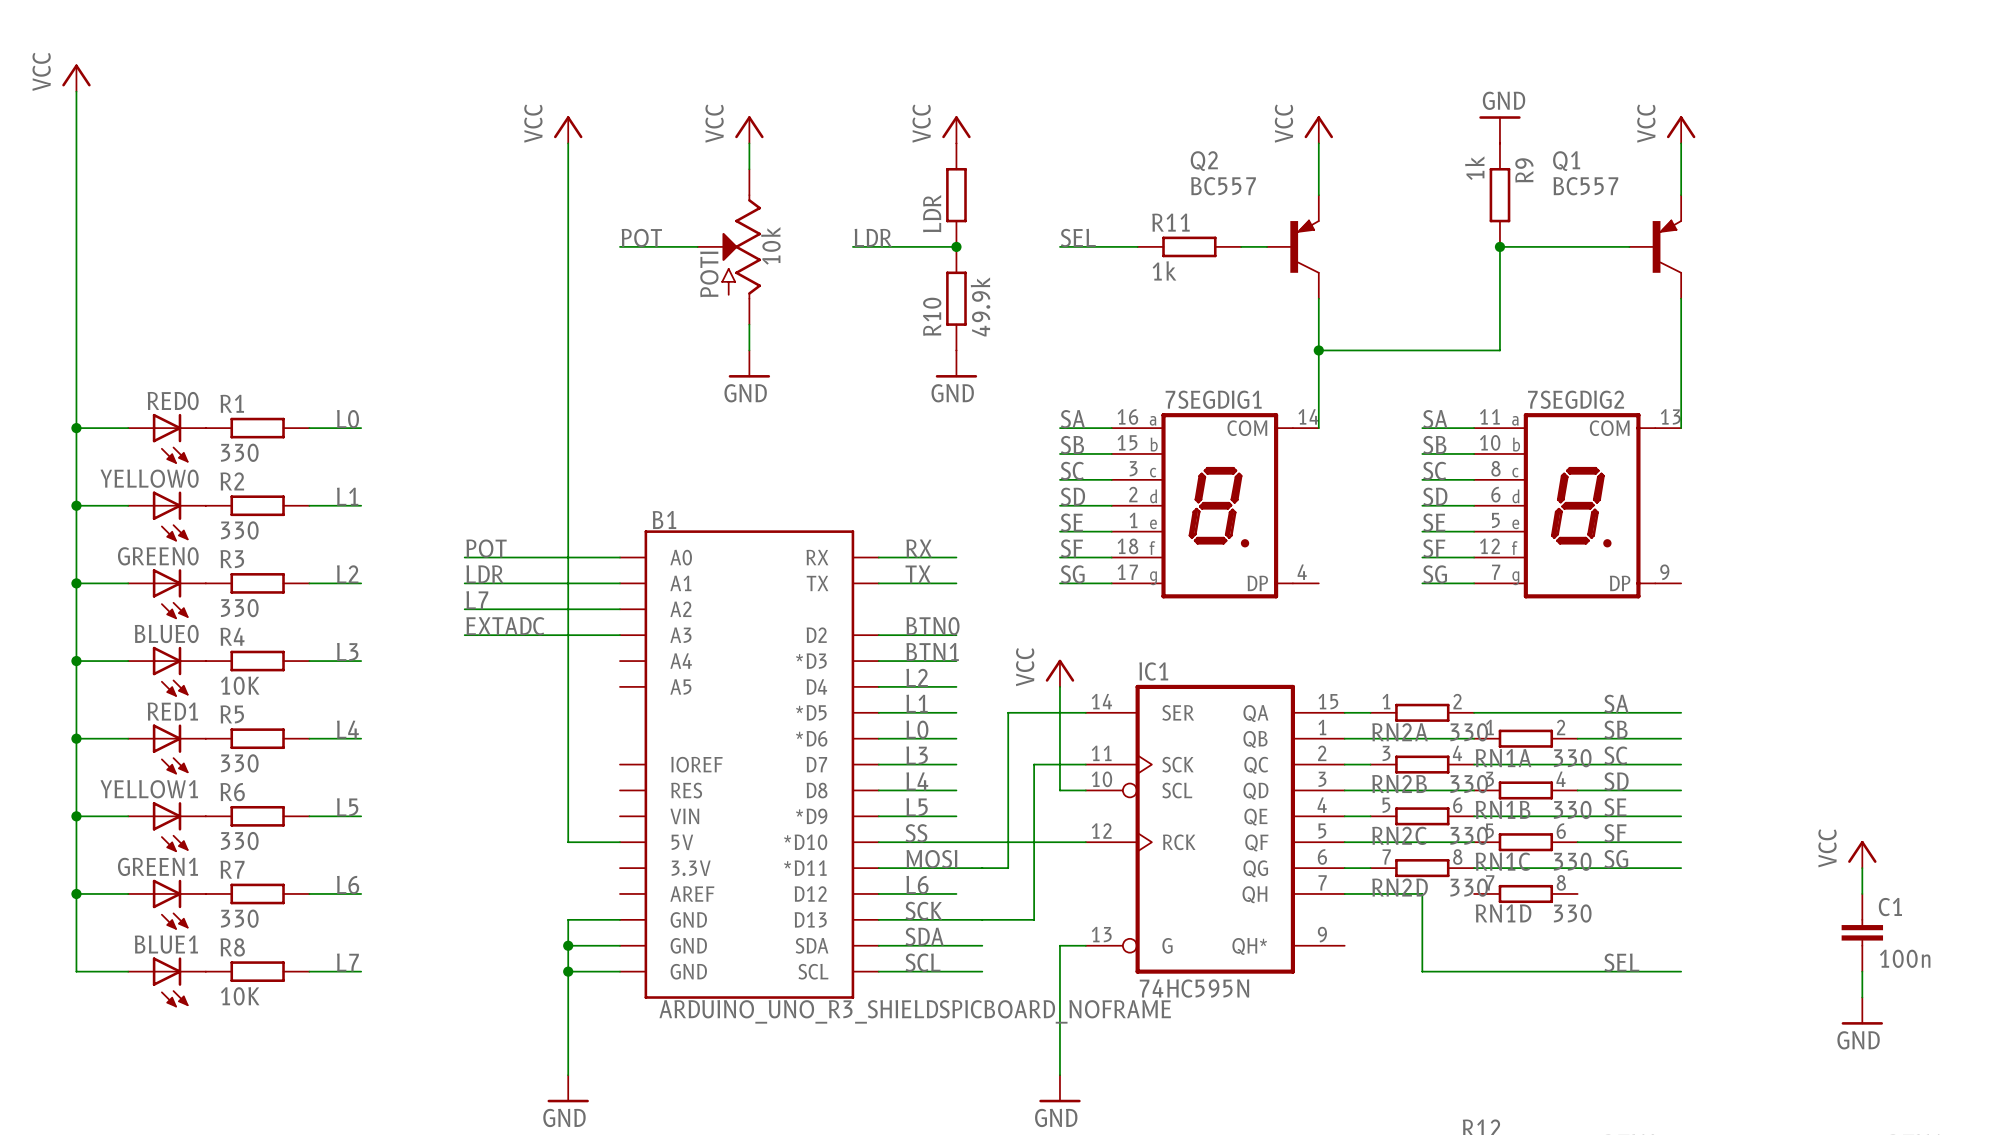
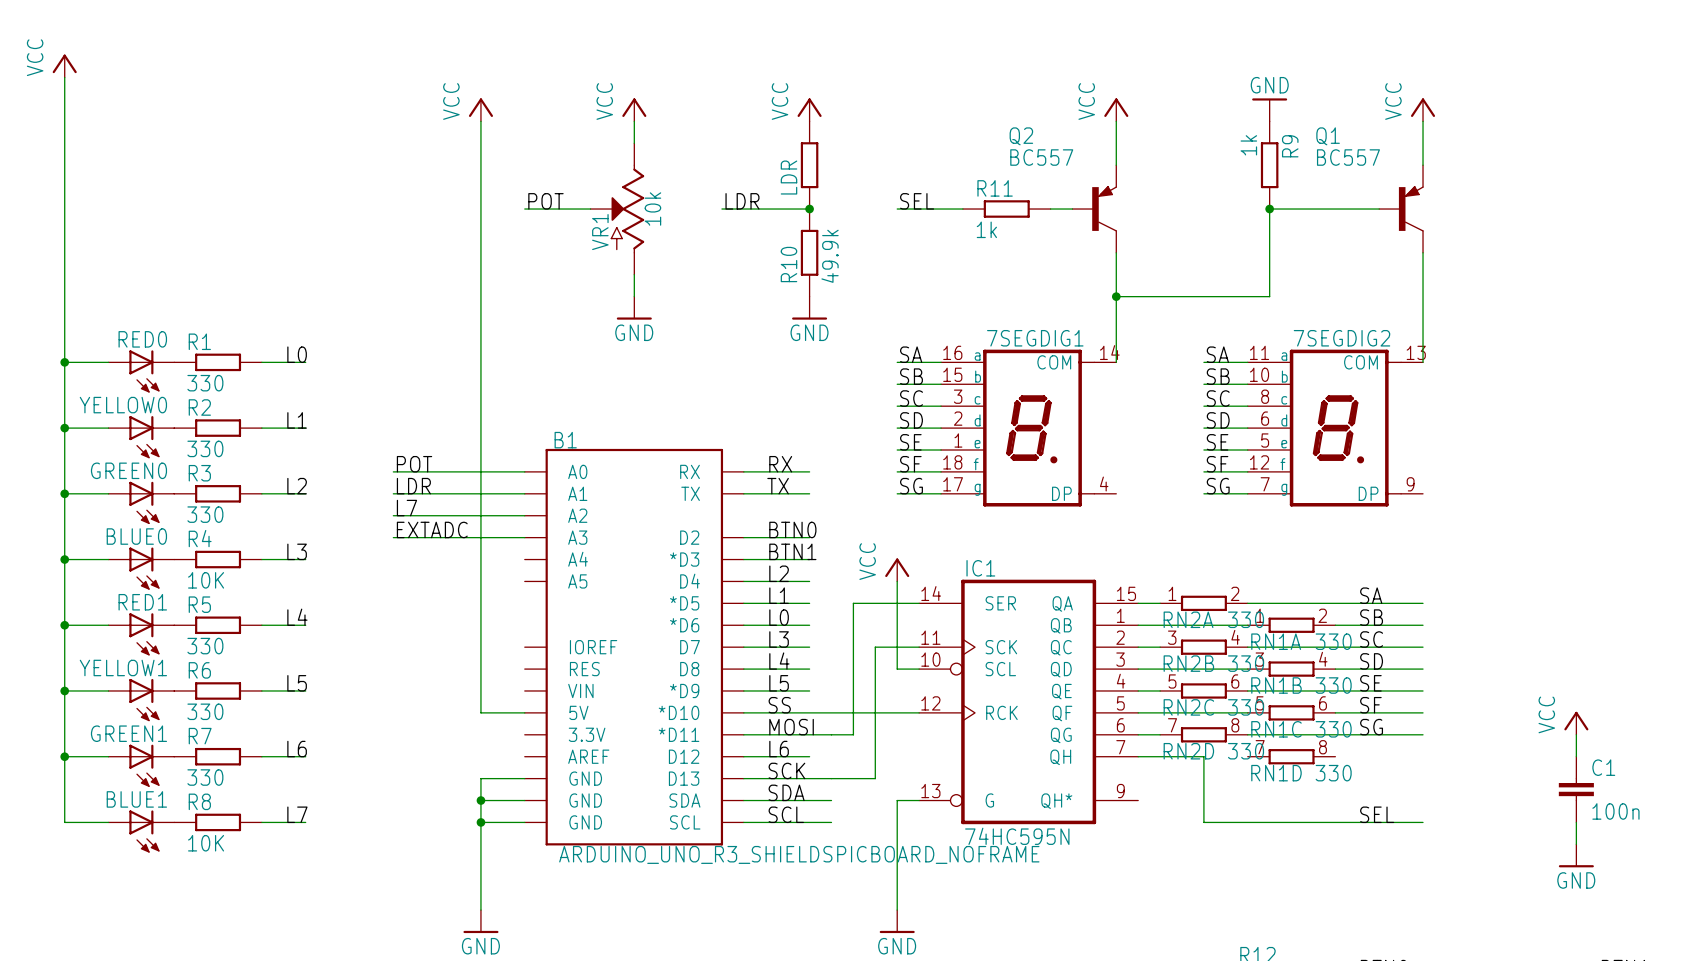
POTI name: POTI (709, 274) -> VR1 (600, 232)

